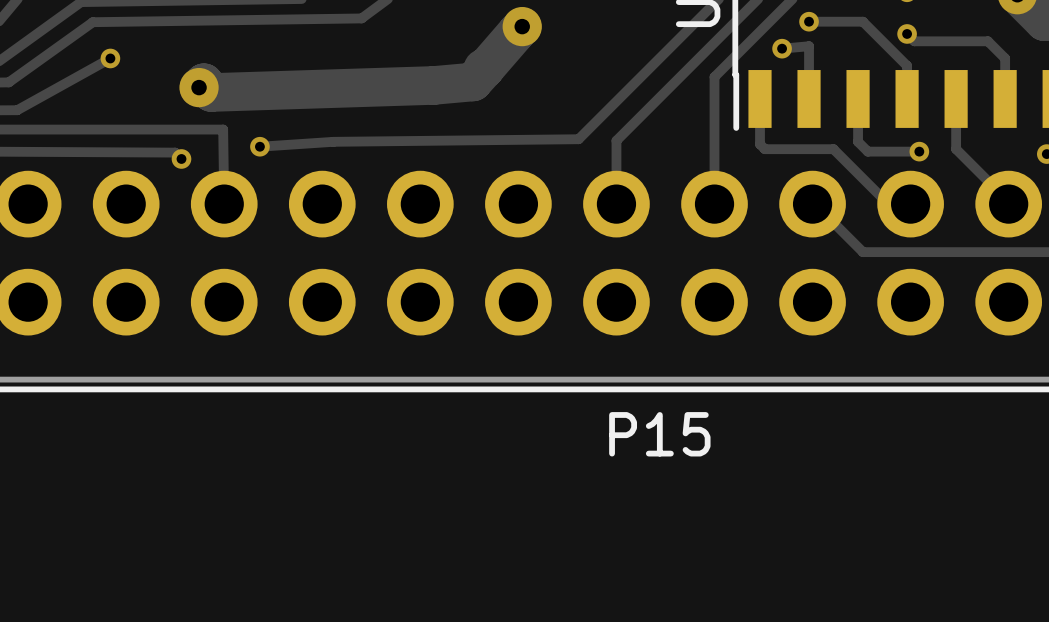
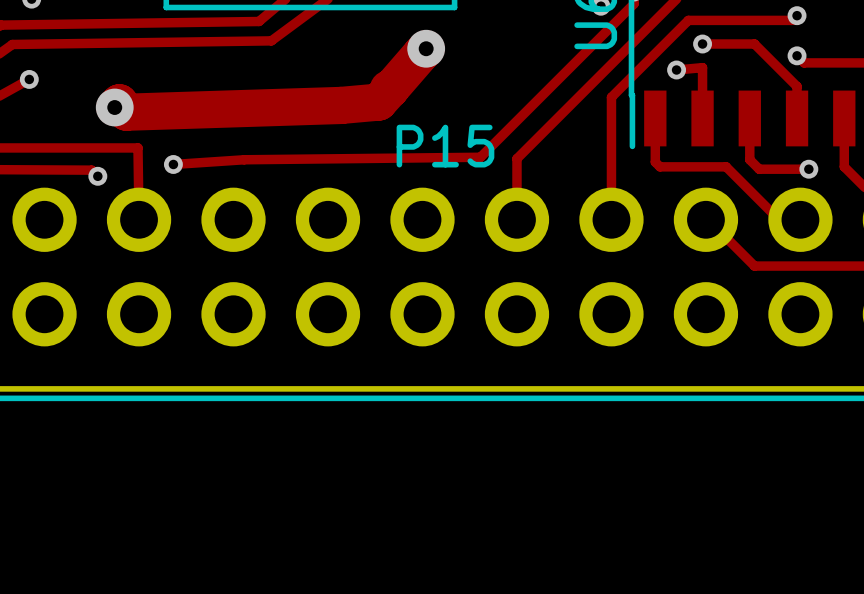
P15 name position: P15 (659, 434) -> P15 (445, 146)

